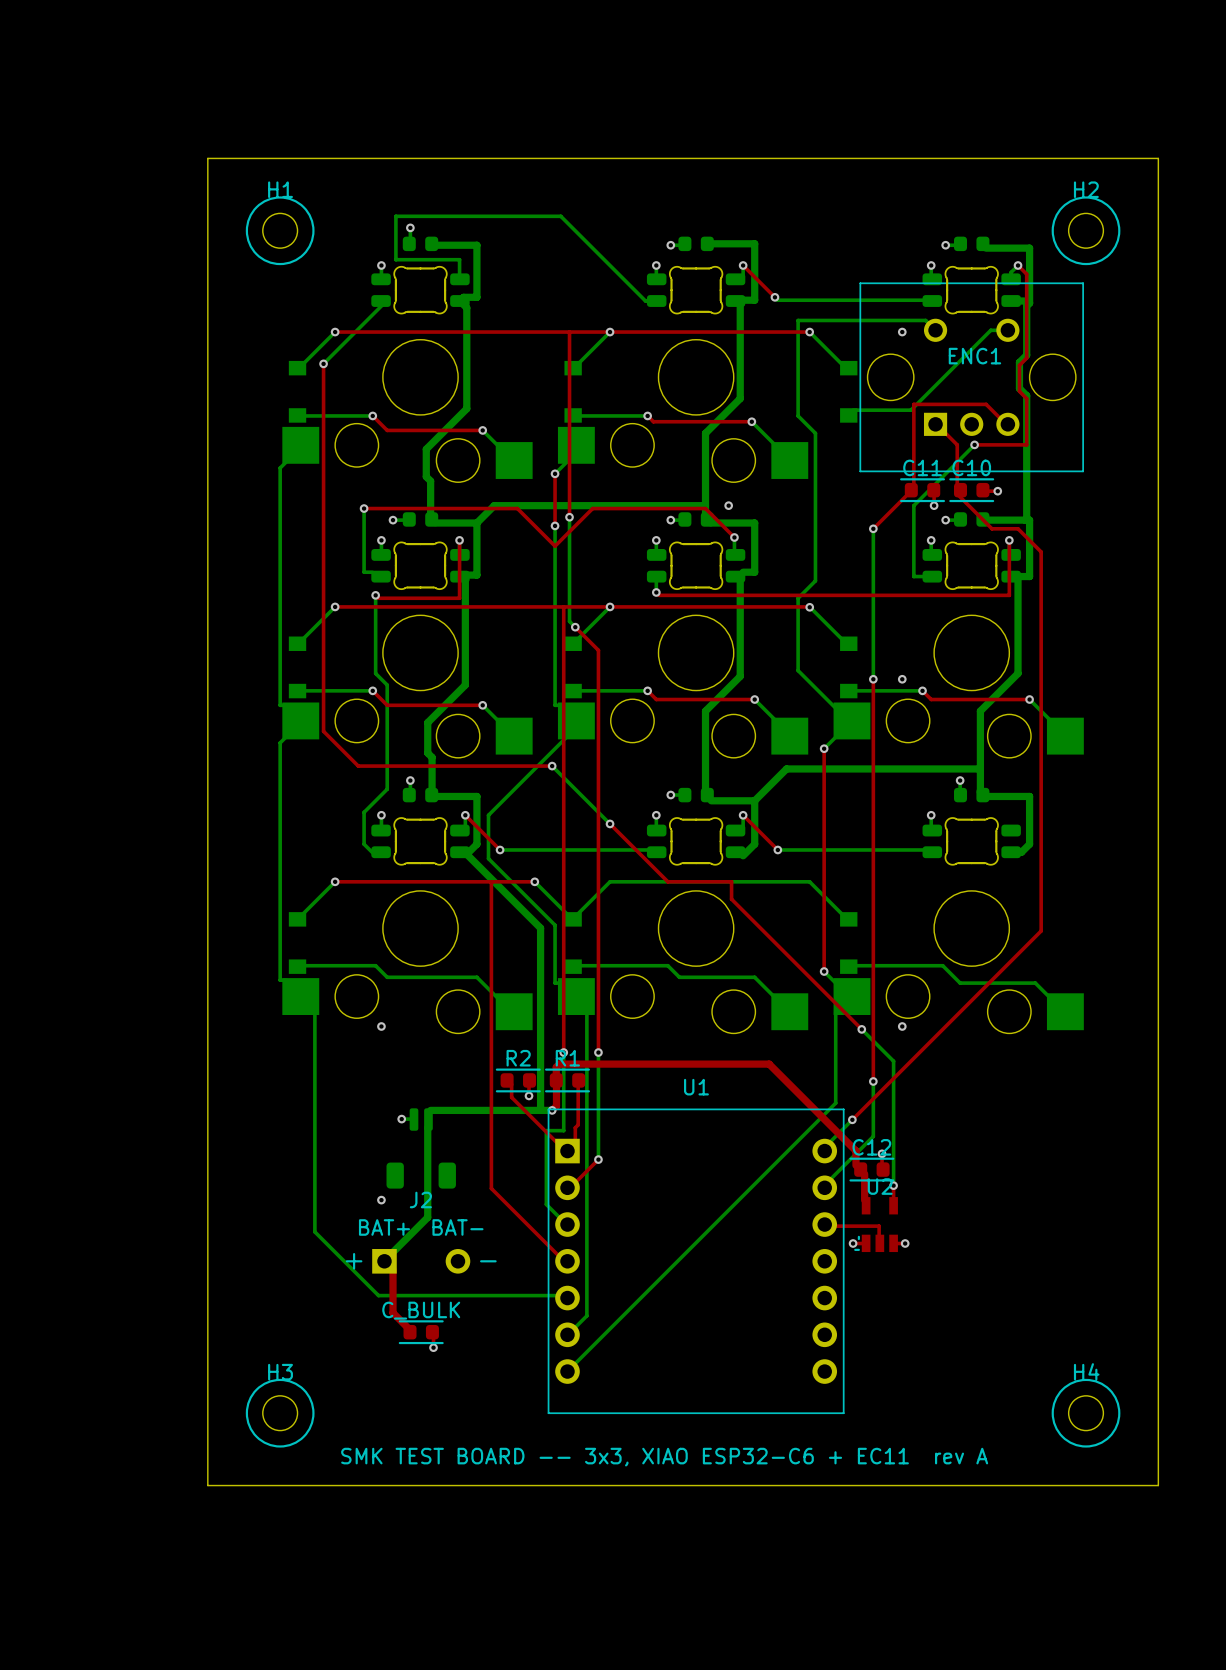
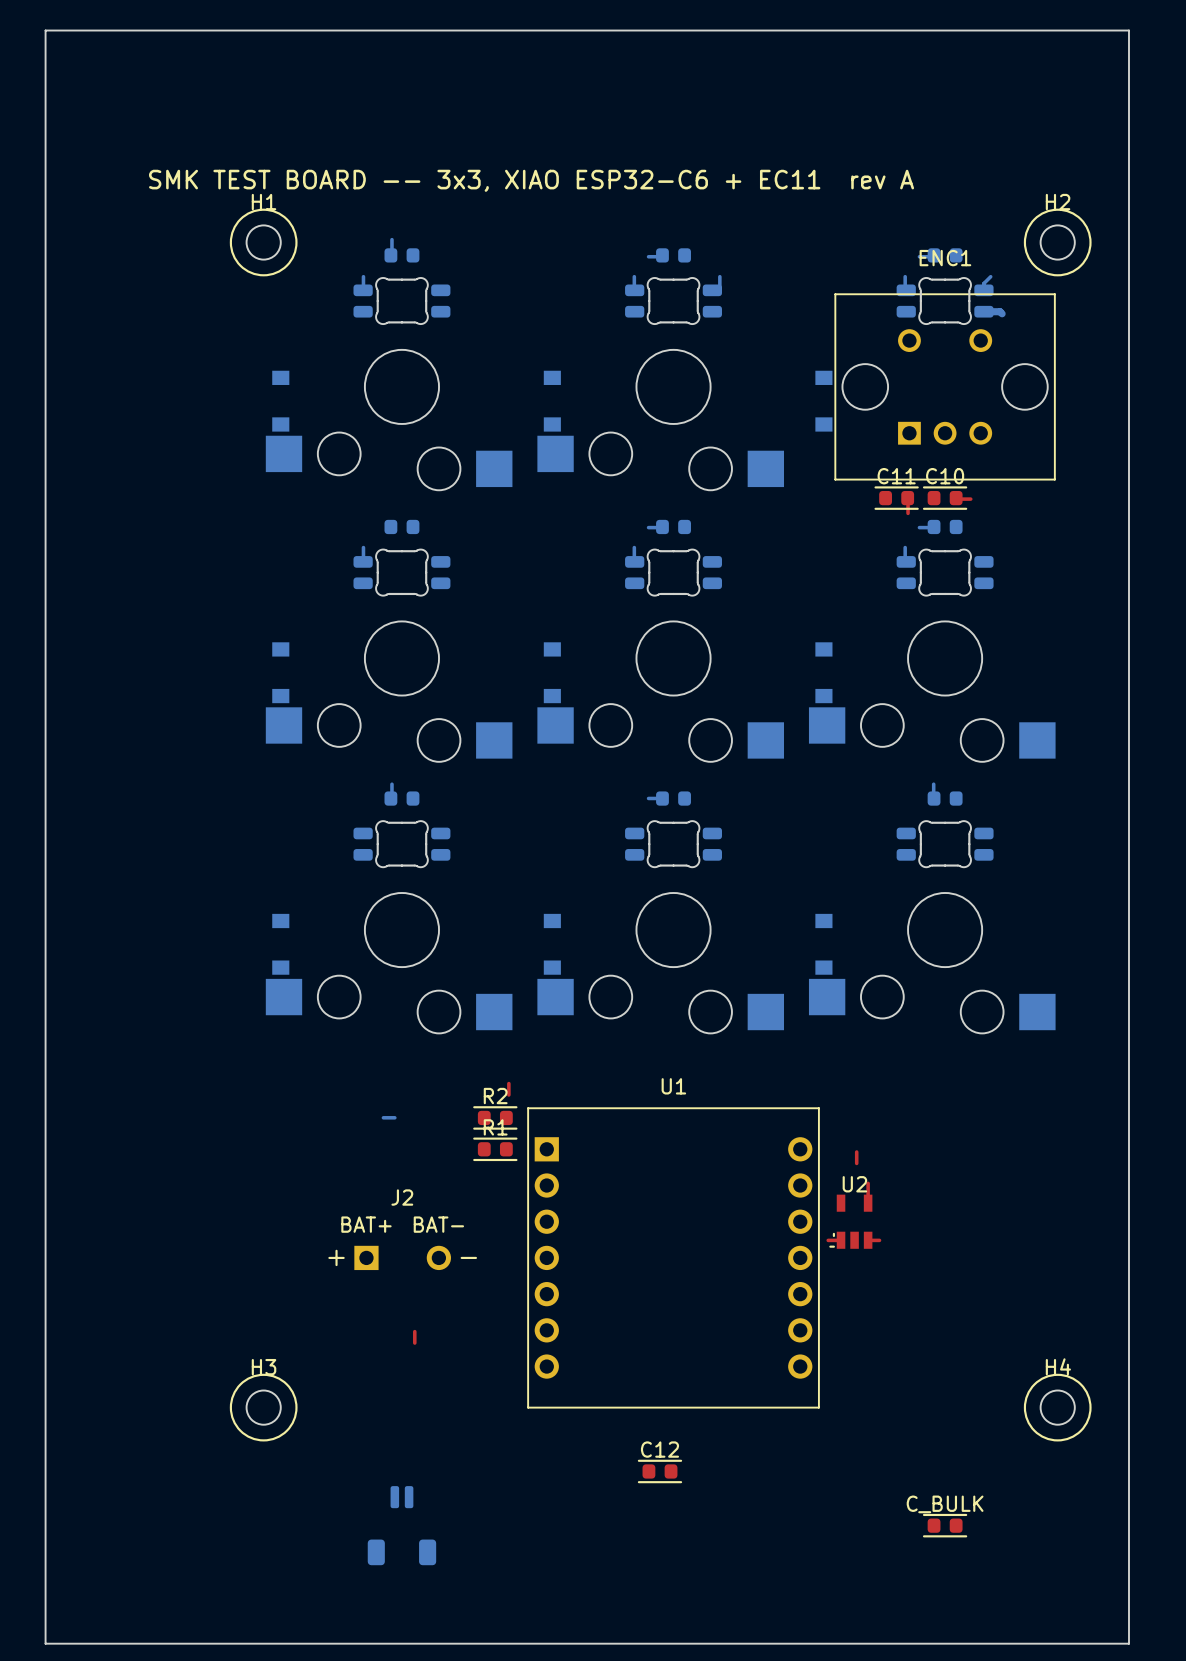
board edge: (1158, 158) (207, 158) (207, 1485) (1158, 1485) -> (1128, 171) (1128, 30) (45, 30) (45, 1643) (1128, 1643) (1128, 1478)
text: none -> SMK TEST BOARD -- 3x3, XIAO ESP32-C6 + EC11 rev A (531, 180)
via: (410, 227) -> none
bottom track: (431, 243) (476, 245) (476, 297) (463, 297) (459, 301) (466, 307) (466, 408) (426, 449) (426, 476) (430, 481) (431, 519) -> none
bottom track: (707, 243) (754, 243) (754, 300) (735, 301) -> none
via: (670, 245) -> none
via: (945, 245) -> none
bottom track: (986, 248) (1029, 248) (1026, 355) (1019, 362) (1019, 388) (1026, 395) (1025, 520) -> none
via: (381, 265) -> none
via: (656, 265) -> none
top track: (743, 265) (774, 297) -> none
via: (743, 265) -> none
via: (931, 265) -> none
top track: (1018, 265) (1026, 274) (1026, 358) (1019, 365) (1019, 391) (1026, 398) (1026, 444) (974, 444) -> none
via: (1018, 265) -> none
bottom track: (459, 279) (459, 259) (395, 259) (395, 216) (560, 216) (645, 301) (656, 301) -> none
bottom track: (774, 297) (777, 300) (932, 301) -> none
via: (774, 297) -> none
bottom track: (384, 303) (323, 363) -> none
bottom track: (740, 303) (740, 398) (705, 433) (705, 514) -> none
bottom track: (935, 330) (925, 320) (798, 320) (798, 415) (815, 433) (815, 580) (798, 598) (798, 670) (835, 708) -> none
bottom track: (1007, 330) (990, 330) (910, 410) (853, 410) -> none
top track: (335, 332) (809, 332) -> none
bottom track: (335, 332) (303, 363) -> none
via: (335, 332) -> none
top track: (569, 332) (569, 517) -> none
bottom track: (610, 332) (578, 363) -> none
via: (610, 332) -> none
bottom track: (809, 332) (841, 363) -> none
via: (809, 332) -> none
via: (902, 332) -> none
ENC1 name position: ENC1 (974, 356) -> ENC1 (945, 258)
top track: (323, 363) (323, 731) (358, 766) (552, 766) -> none
via: (323, 363) -> none
bottom track: (303, 415) (372, 415) -> none
top track: (372, 415) (387, 430) (482, 430) -> none
via: (372, 415) -> none
bottom track: (578, 415) (647, 415) -> none
top track: (647, 415) (653, 421) (751, 421) -> none
via: (647, 415) -> none
top track: (1000, 418) (986, 404) (913, 404) (913, 485) -> none
bottom track: (751, 421) (774, 444) -> none
via: (751, 421) -> none
bottom track: (482, 430) (497, 444) -> none
via: (482, 430) -> none
top track: (945, 433) (957, 444) (957, 485) -> none
bottom track: (974, 444) (913, 505) (913, 576) (932, 576) -> none
via: (974, 444) -> none
bottom track: (285, 462) (280, 468) (280, 705) (285, 705) -> none
bottom track: (566, 462) (555, 473) -> none
top track: (555, 473) (555, 525) -> none
via: (555, 473) -> none
via: (997, 491) -> none
top track: (908, 494) (873, 528) -> none
top track: (957, 494) (991, 528) (1018, 528) (1041, 551) (1041, 931) (852, 1119) -> none
bottom track: (705, 505) (494, 505) (476, 523) -> none
via: (728, 505) -> none
via: (934, 505) -> none
top track: (364, 508) (517, 508) (555, 546) (592, 508) (705, 508) (734, 537) -> none
bottom track: (364, 508) (364, 572) (372, 572) -> none
via: (364, 508) -> none
bottom track: (569, 517) (569, 621) (575, 627) -> none
via: (569, 517) -> none
bottom track: (982, 519) (1029, 520) (1029, 576) (1011, 576) -> none
bottom track: (393, 520) (404, 520) -> none
via: (393, 520) -> none
via: (670, 520) -> none
via: (945, 520) -> none
bottom track: (436, 523) (476, 523) -> none
bottom track: (476, 523) (476, 575) (459, 576) -> none
bottom track: (711, 523) (754, 523) (754, 572) (743, 572) -> none
bottom track: (555, 525) (555, 705) (560, 705) -> none
via: (555, 525) -> none
bottom track: (873, 528) (873, 679) -> none
via: (873, 528) -> none
bottom track: (734, 537) (734, 551) -> none
via: (734, 537) -> none
via: (381, 540) -> none
top track: (459, 540) (459, 598) (378, 598) (375, 595) -> none
via: (459, 540) -> none
via: (656, 540) -> none
via: (931, 540) -> none
top track: (1009, 540) (1009, 595) (659, 595) (656, 592) -> none
via: (1009, 540) -> none
bottom track: (465, 580) (465, 685) (427, 722) (427, 753) (432, 757) (433, 796) (476, 796) (476, 844) (468, 852) -> none
bottom track: (656, 580) (656, 592) -> none
bottom track: (740, 580) (740, 676) (705, 711) (705, 792) -> none
bottom track: (1018, 580) (1018, 673) (980, 711) (980, 792) (984, 796) (1029, 796) (1029, 844) (1021, 852) (1011, 852) -> none
via: (656, 592) -> none
bottom track: (375, 595) (375, 673) (387, 685) (387, 789) (364, 812) (364, 844) (372, 852) -> none
via: (375, 595) -> none
top track: (335, 606) (809, 607) -> none
bottom track: (335, 606) (303, 638) -> none
via: (335, 606) -> none
top track: (563, 606) (563, 1052) -> none
bottom track: (610, 606) (578, 638) -> none
via: (610, 606) -> none
bottom track: (809, 607) (841, 638) -> none
via: (809, 607) -> none
top track: (575, 627) (598, 650) (598, 1052) -> none
via: (575, 627) -> none
top track: (873, 679) (873, 1081) -> none
via: (873, 679) -> none
via: (902, 679) -> none
bottom track: (303, 690) (372, 690) -> none
top track: (372, 690) (387, 705) (482, 705) -> none
via: (372, 690) -> none
bottom track: (578, 690) (647, 690) -> none
top track: (647, 690) (656, 699) (754, 699) -> none
via: (647, 690) -> none
bottom track: (853, 690) (922, 690) -> none
top track: (922, 690) (931, 699) (1029, 699) -> none
via: (922, 690) -> none
bottom track: (754, 699) (774, 719) -> none
via: (754, 699) -> none
bottom track: (1029, 699) (1049, 719) -> none
via: (1029, 699) -> none
bottom track: (482, 705) (497, 719) -> none
via: (482, 705) -> none
bottom track: (285, 737) (280, 742) (280, 980) (285, 980) -> none
bottom track: (566, 737) (488, 815) (488, 858) (555, 925) (555, 983) (560, 983) -> none
bottom track: (835, 737) (824, 748) -> none
top track: (824, 748) (824, 971) -> none
via: (824, 748) -> none
bottom track: (552, 766) (610, 823) -> none
via: (552, 766) -> none
bottom track: (980, 768) (786, 768) (754, 800) -> none
via: (410, 780) -> none
via: (960, 780) -> none
via: (670, 795) -> none
bottom track: (711, 800) (754, 800) -> none
bottom track: (754, 800) (754, 844) (743, 855) -> none
bottom track: (381, 815) (381, 826) -> none
via: (381, 815) -> none
top track: (465, 815) (500, 849) -> none
bottom track: (465, 815) (465, 826) -> none
via: (465, 815) -> none
bottom track: (656, 815) (656, 826) -> none
via: (656, 815) -> none
top track: (743, 815) (777, 849) -> none
bottom track: (743, 815) (743, 826) -> none
via: (743, 815) -> none
bottom track: (931, 815) (931, 826) -> none
via: (931, 815) -> none
top track: (610, 823) (667, 881) (731, 881) (731, 899) (861, 1029) -> none
via: (610, 823) -> none
bottom track: (500, 849) (650, 849) -> none
via: (500, 849) -> none
bottom track: (777, 849) (930, 849) (932, 852) -> none
via: (777, 849) -> none
bottom track: (468, 855) (540, 928) (540, 1110) -> none
top track: (335, 881) (534, 881) -> none
bottom track: (335, 881) (303, 913) -> none
via: (335, 881) -> none
top track: (491, 881) (491, 1188) (564, 1261) (567, 1261) -> none
bottom track: (534, 881) (566, 913) -> none
via: (534, 881) -> none
bottom track: (578, 913) (610, 881) (809, 881) (841, 913) -> none
bottom track: (303, 965) (375, 965) (387, 977) (476, 977) (497, 997) -> none
bottom track: (578, 965) (667, 965) (679, 977) (754, 977) (774, 997) -> none
bottom track: (853, 965) (942, 965) (960, 983) (1035, 983) (1049, 997) -> none
bottom track: (824, 971) (835, 983) -> none
via: (824, 971) -> none
bottom track: (314, 1012) (314, 1231) (378, 1295) (557, 1295) -> none
bottom track: (586, 1012) (586, 1315) (575, 1327) -> none
bottom track: (835, 1012) (835, 1103) (567, 1371) -> none
via: (381, 1026) -> none
via: (902, 1026) -> none
bottom track: (861, 1029) (893, 1061) (893, 1185) -> none
via: (861, 1029) -> none
bottom track: (563, 1052) (563, 1130) (546, 1130) (546, 1204) (567, 1224) -> none
via: (563, 1052) -> none
bottom track: (598, 1052) (598, 1159) -> none
via: (598, 1052) -> none
R2 position: (518, 1080) -> (495, 1117)
R1 position: (567, 1080) -> (495, 1149)
top track: (578, 1080) (578, 1124) (575, 1127) (575, 1142) -> none
bottom track: (873, 1081) (873, 1136) (829, 1179) -> none
via: (873, 1081) -> none
top track: (511, 1084) (511, 1097) (565, 1151) (567, 1151) -> none
via: (529, 1095) -> none
bottom track: (430, 1110) (552, 1110) -> none
top track: (552, 1110) (556, 1106) (556, 1067) (559, 1064) (769, 1064) (855, 1150) (855, 1165) -> none
via: (552, 1110) -> none
via: (401, 1119) -> none
bottom track: (852, 1119) (829, 1142) -> none
via: (852, 1119) -> none
bottom track: (427, 1127) (427, 1217) (393, 1252) -> none
part: (421, 1148) -> none
via: (882, 1153) -> none
top track: (598, 1159) (575, 1182) -> none
via: (598, 1159) -> none
C12 position: (871, 1169) -> (659, 1471)
top track: (864, 1174) (864, 1200) -> none
via: (893, 1185) -> none
via: (381, 1200) -> none
top track: (832, 1226) (879, 1226) (879, 1237) -> none
via: (853, 1243) -> none
via: (905, 1243) -> none
top track: (393, 1269) (393, 1312) (407, 1327) -> none
C_BULK: (421, 1332) -> none
via: (433, 1347) -> none
text: SMK TEST BOARD -- 3x3, XIAO ESP32-C6 + EC11 rev A (664, 1457) -> none
part: none -> (401, 1525)
C_BULK: none -> (945, 1525)

